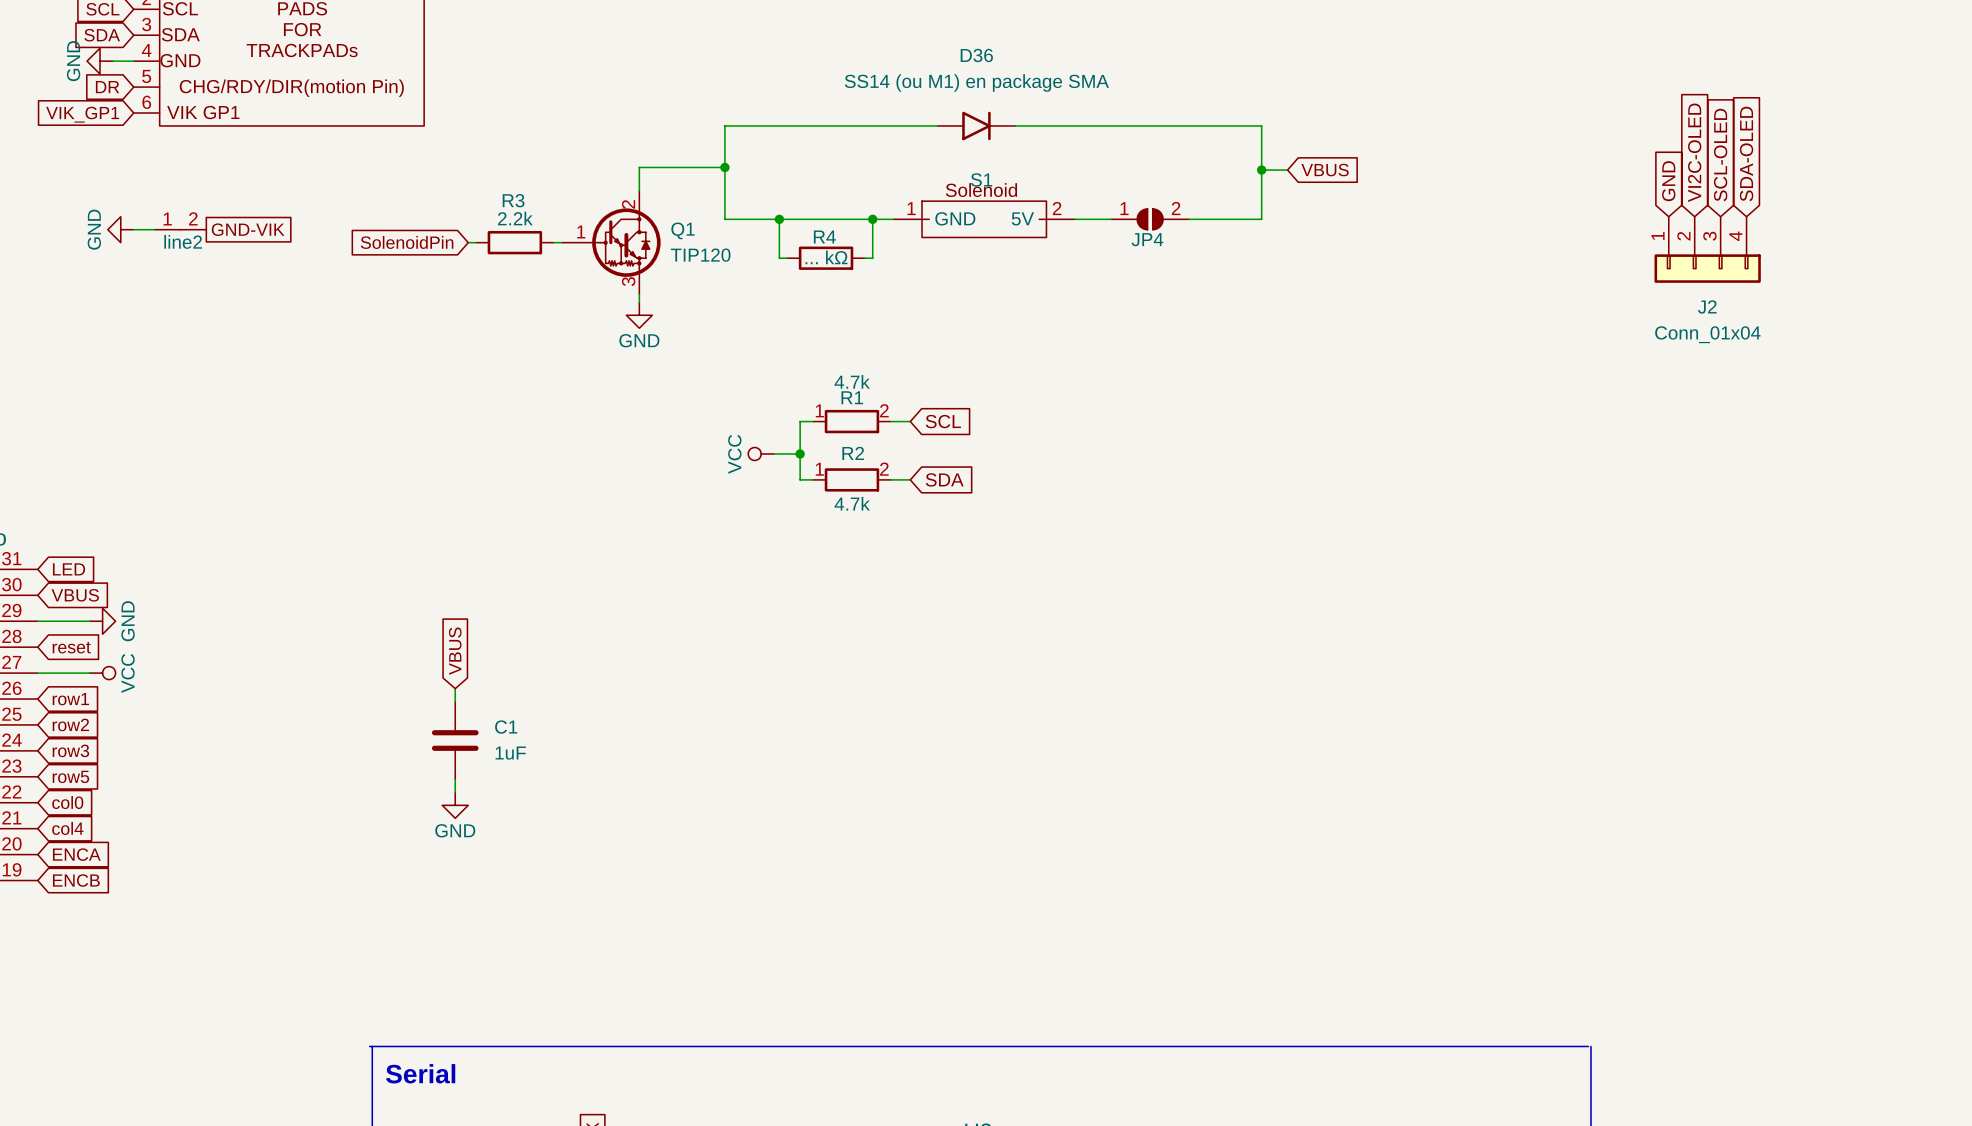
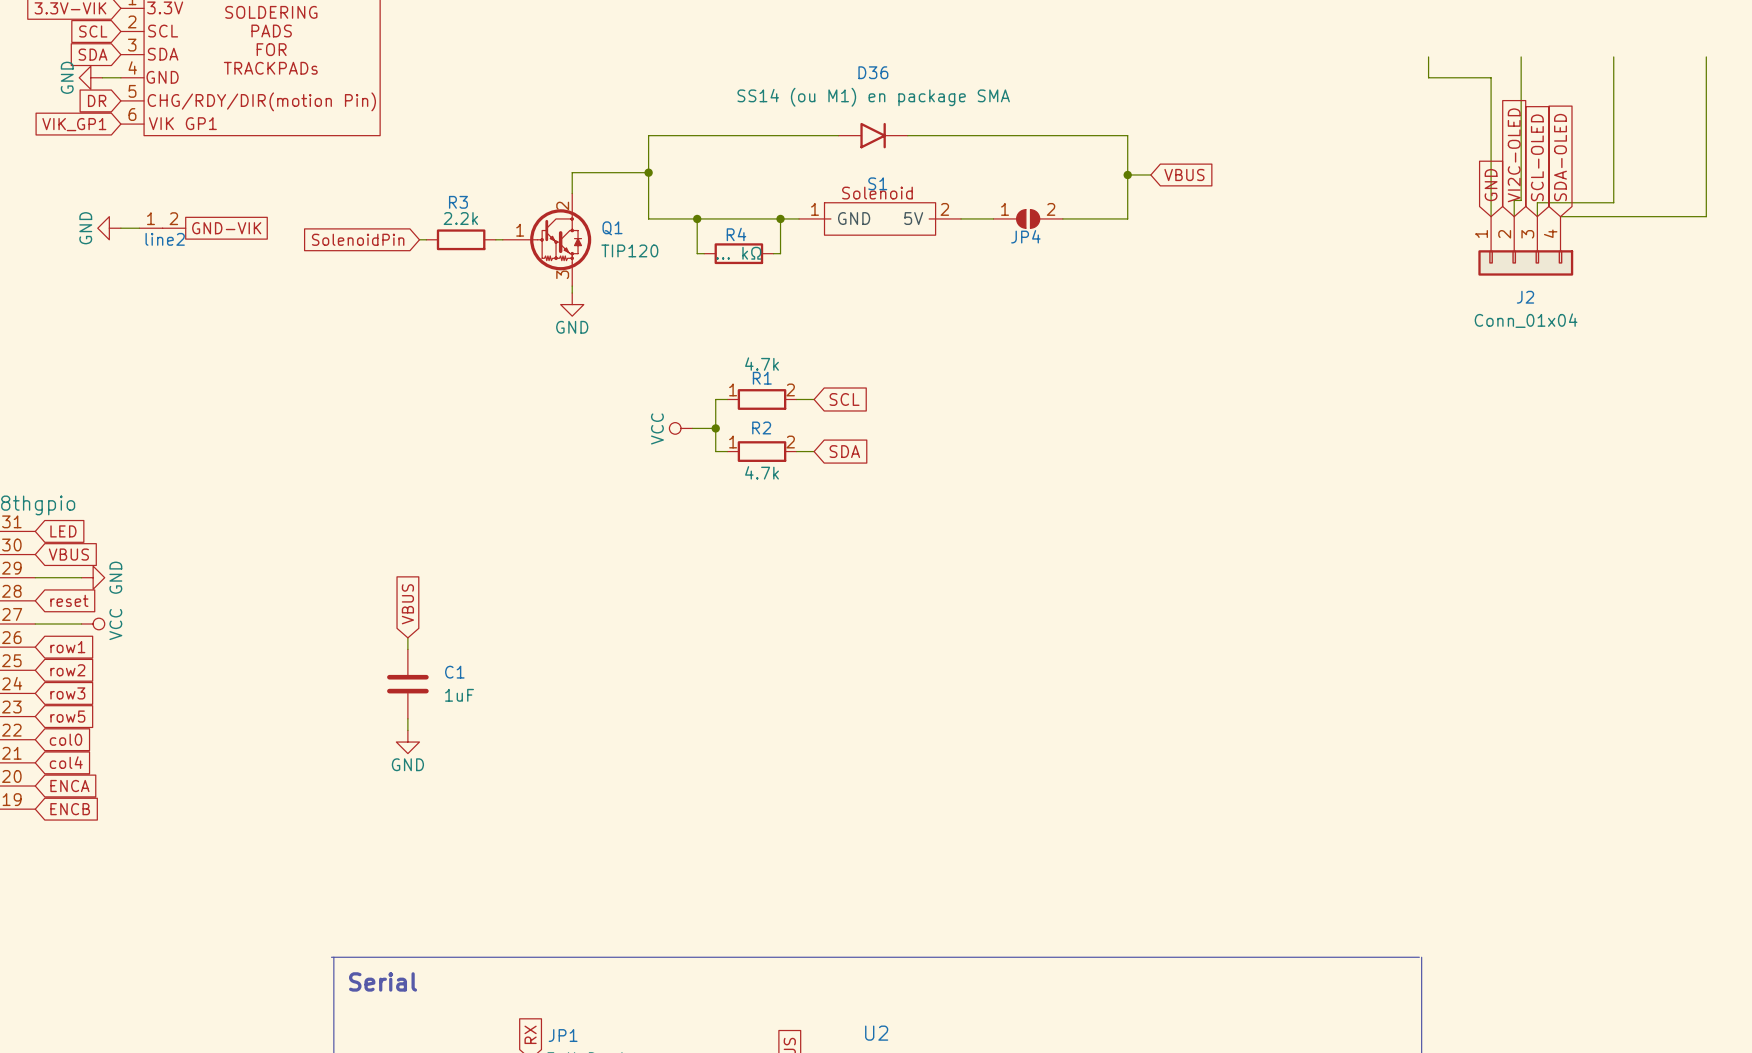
wire: none -> (1428, 56) (1428, 77) (1491, 77) (1491, 216)
wire: none -> (1521, 56) (1521, 200) (1514, 200) (1514, 216)
wire: none -> (1613, 56) (1613, 202) (1537, 202) (1537, 216)
wire: none -> (1706, 56) (1706, 216) (1560, 216)

